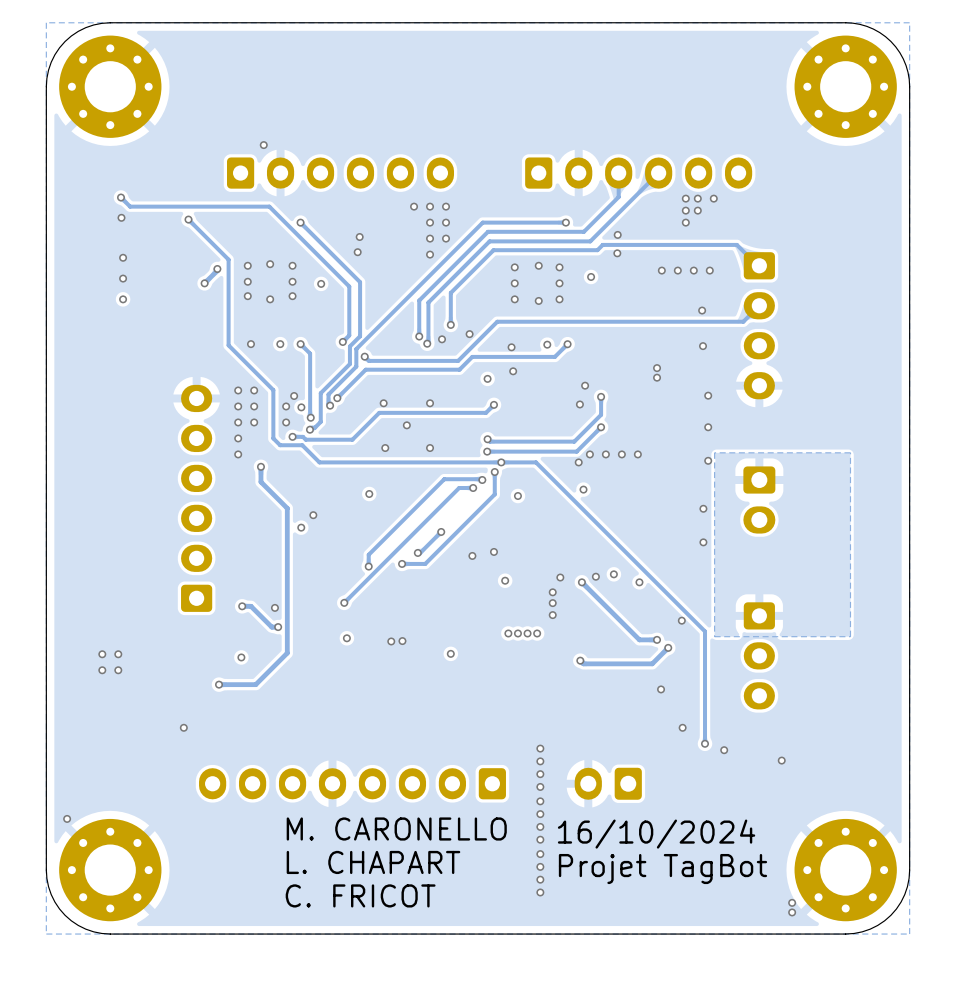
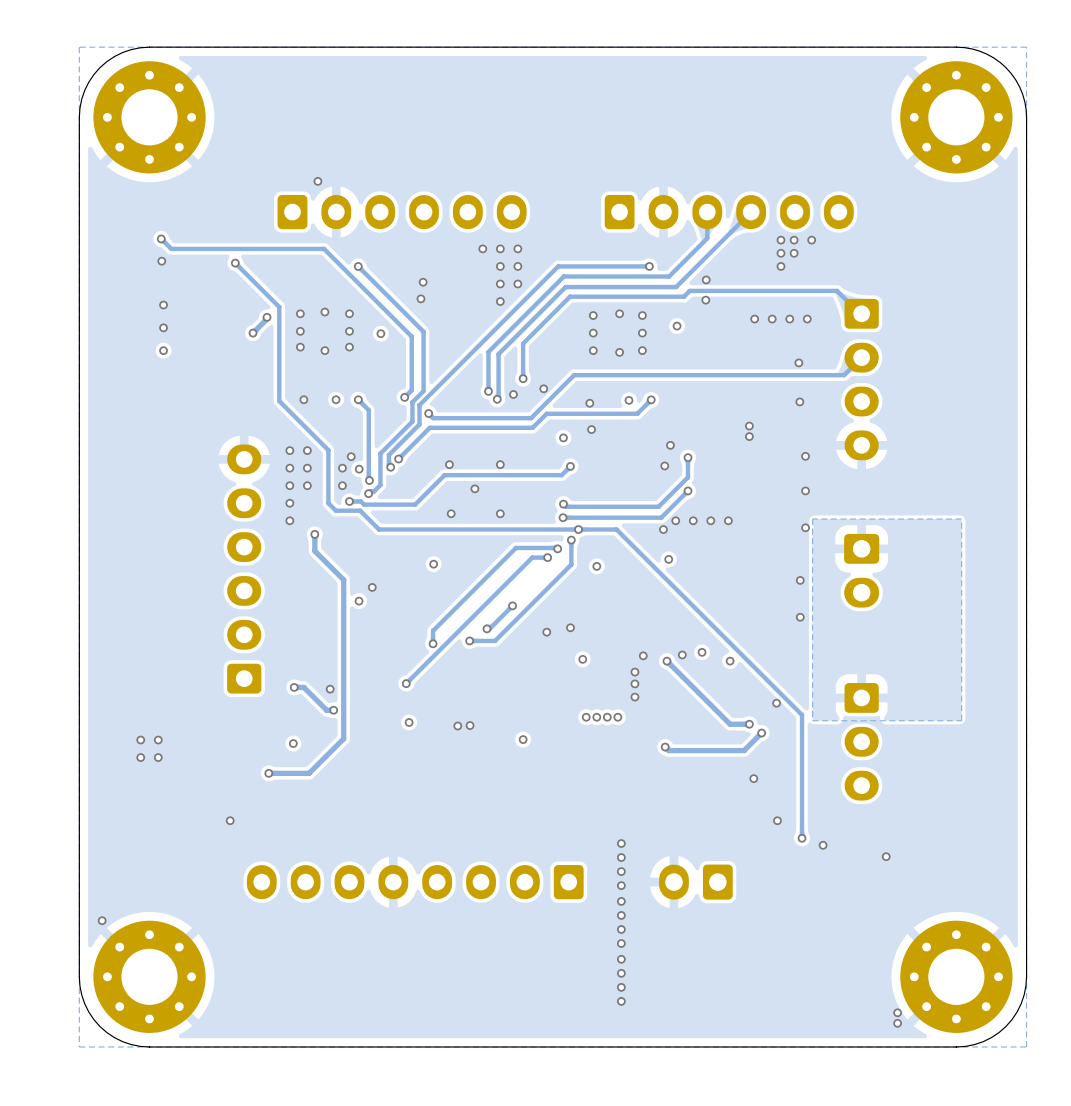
text: M. CARONELLO (396, 829) -> none
text: 16/10/2024 (656, 834) -> none
text: L. CHAPART (373, 862) -> none
text: Projet TagBot (662, 869) -> none
text: C. FRICOT (360, 895) -> none

